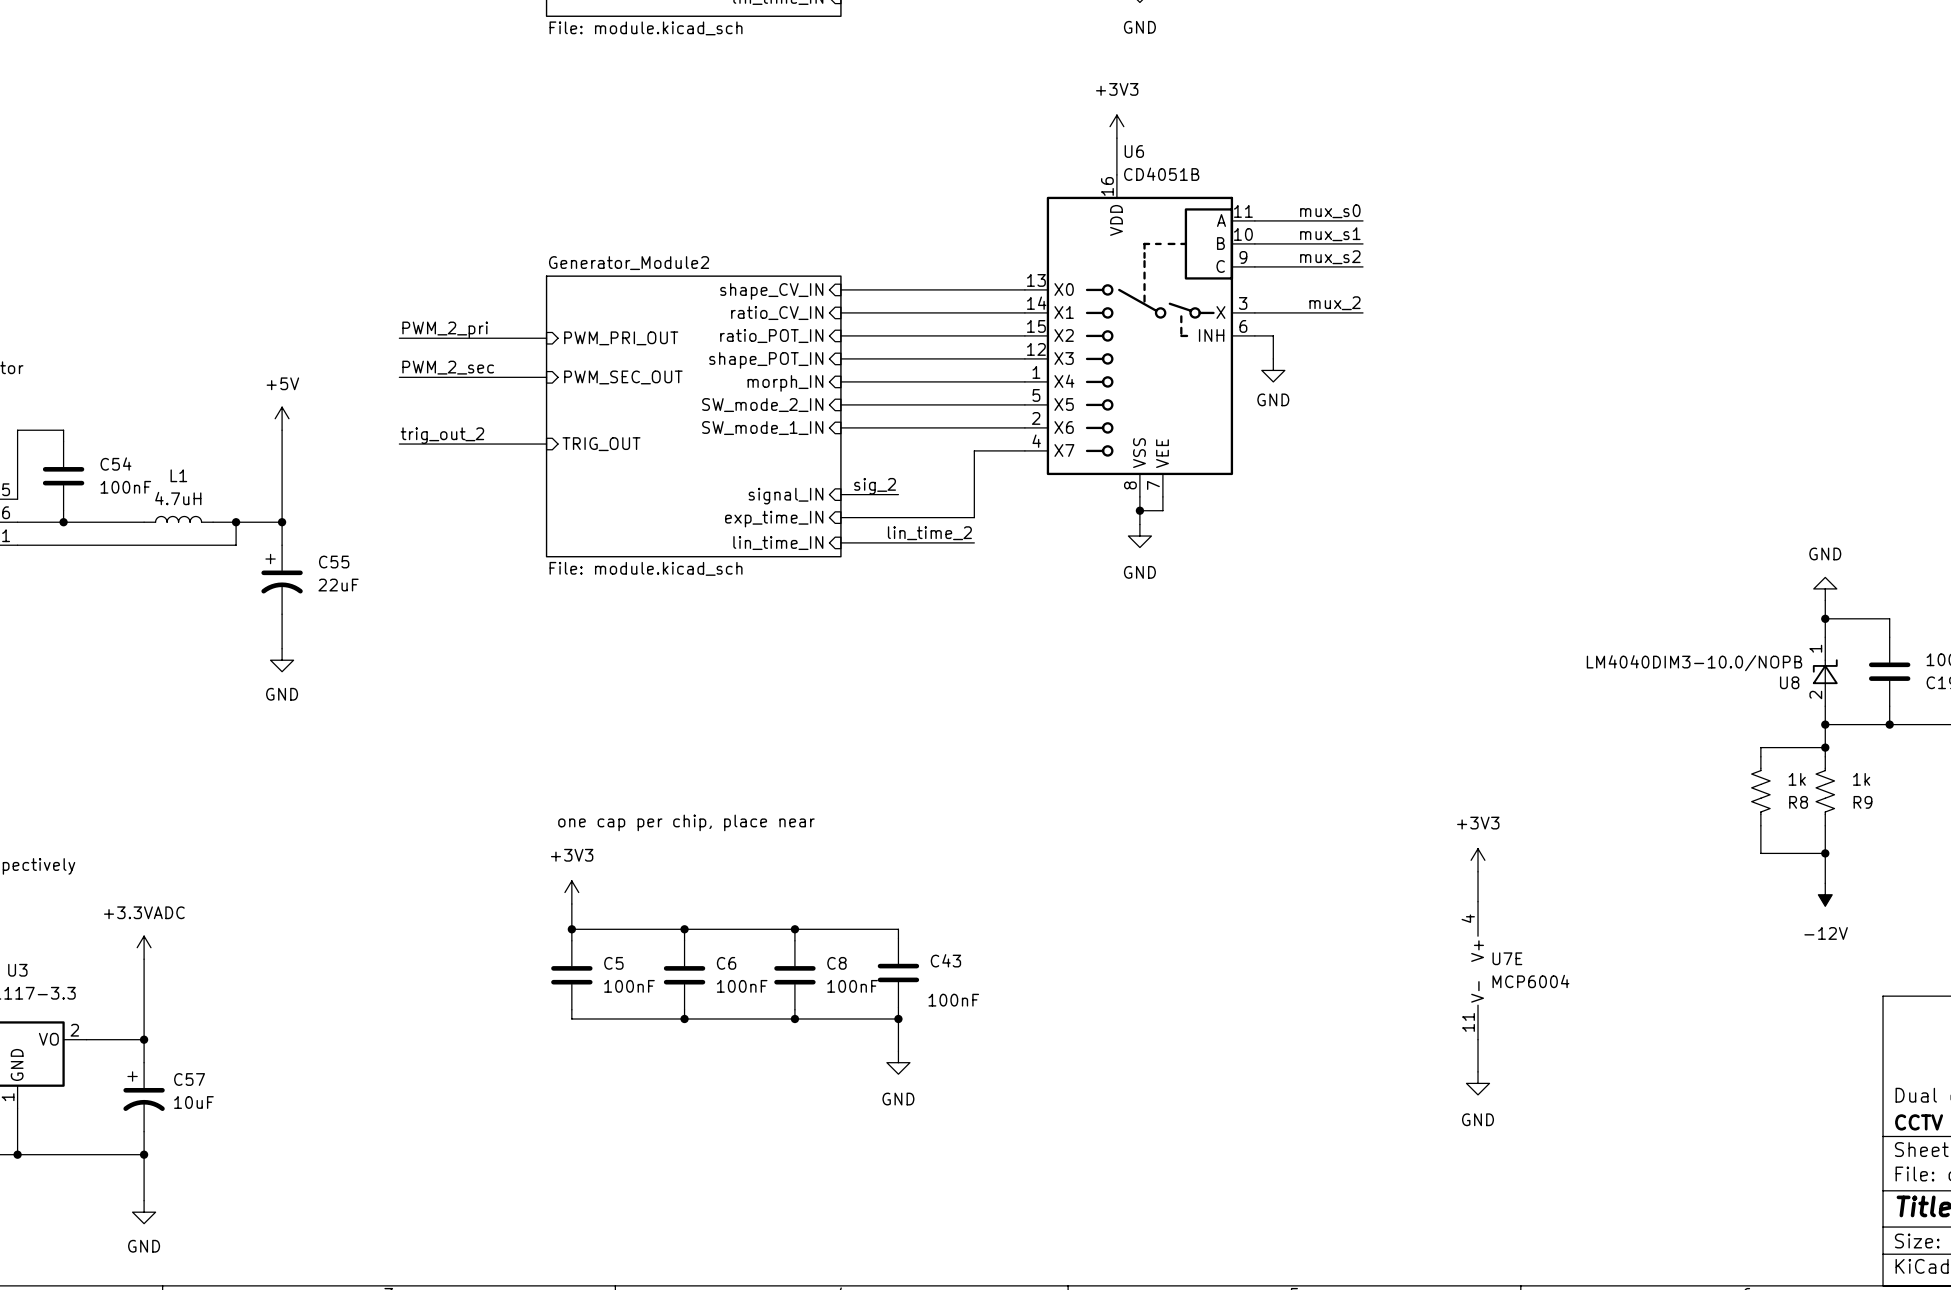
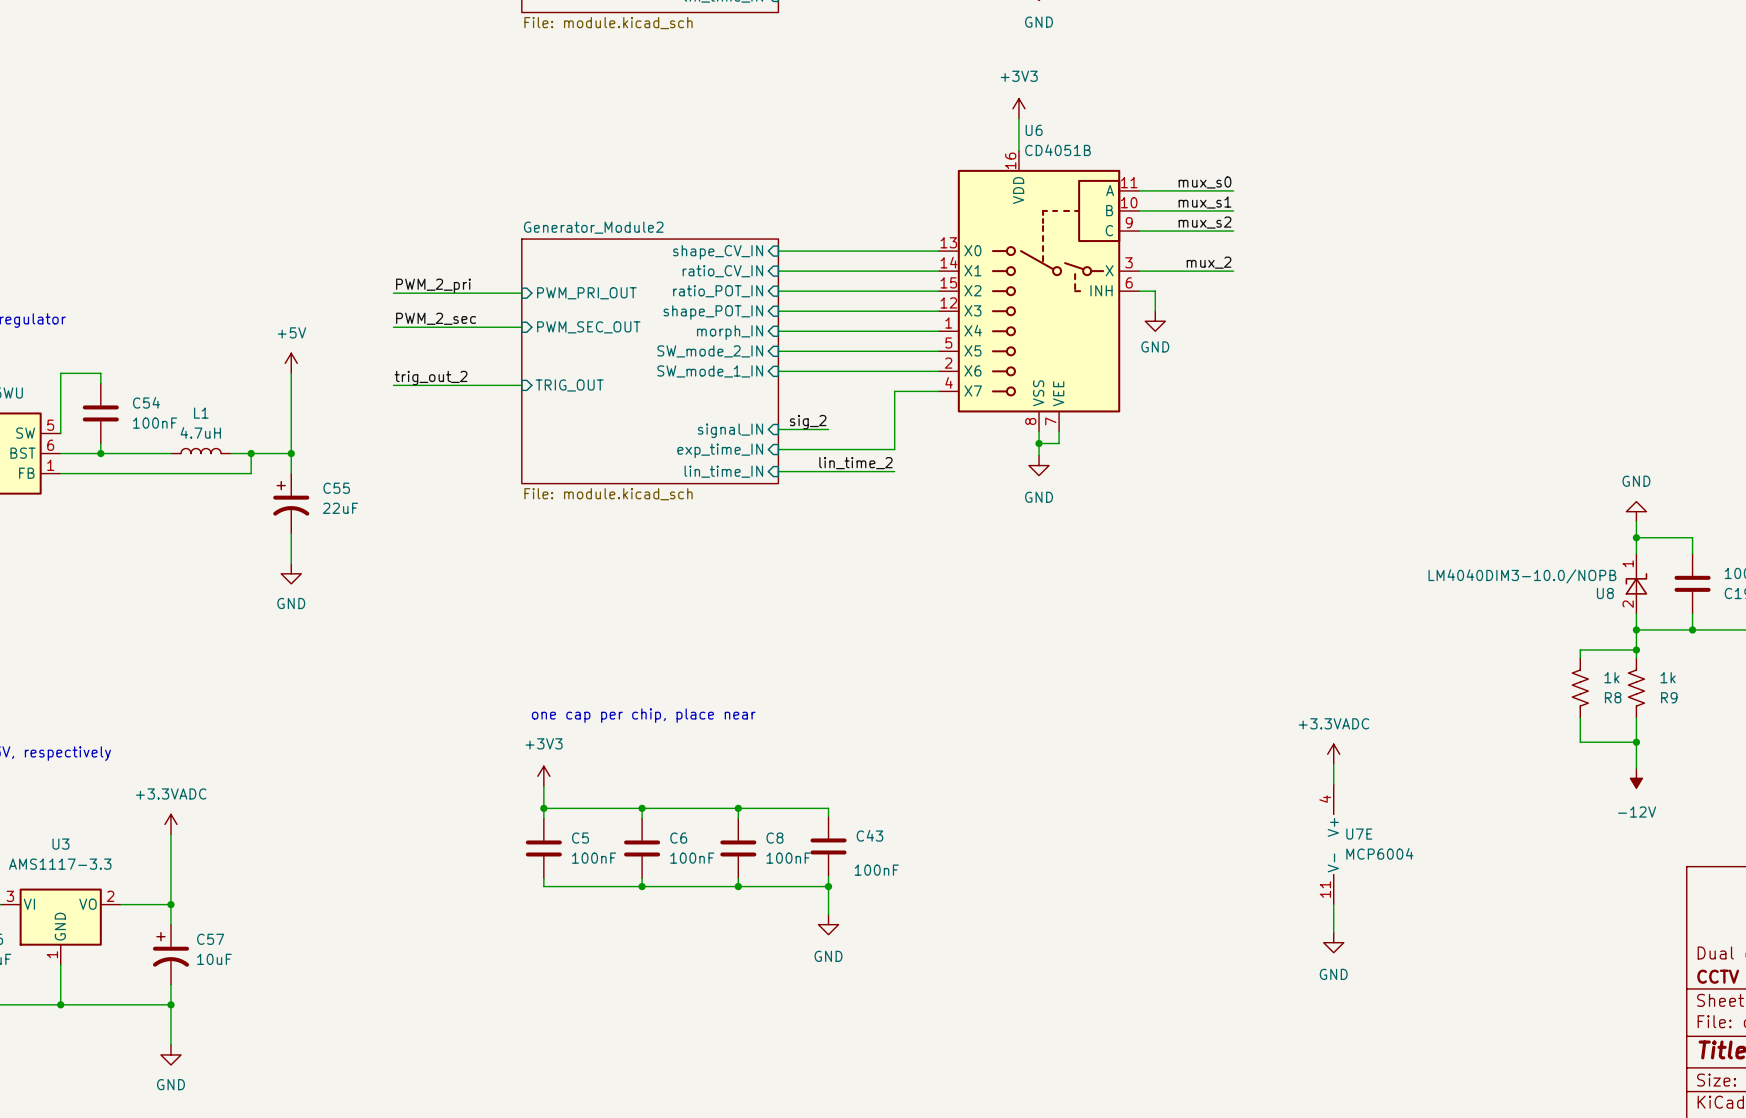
power symbol: +3V3 (1478, 860) -> +3.3VADC (1333, 754)

